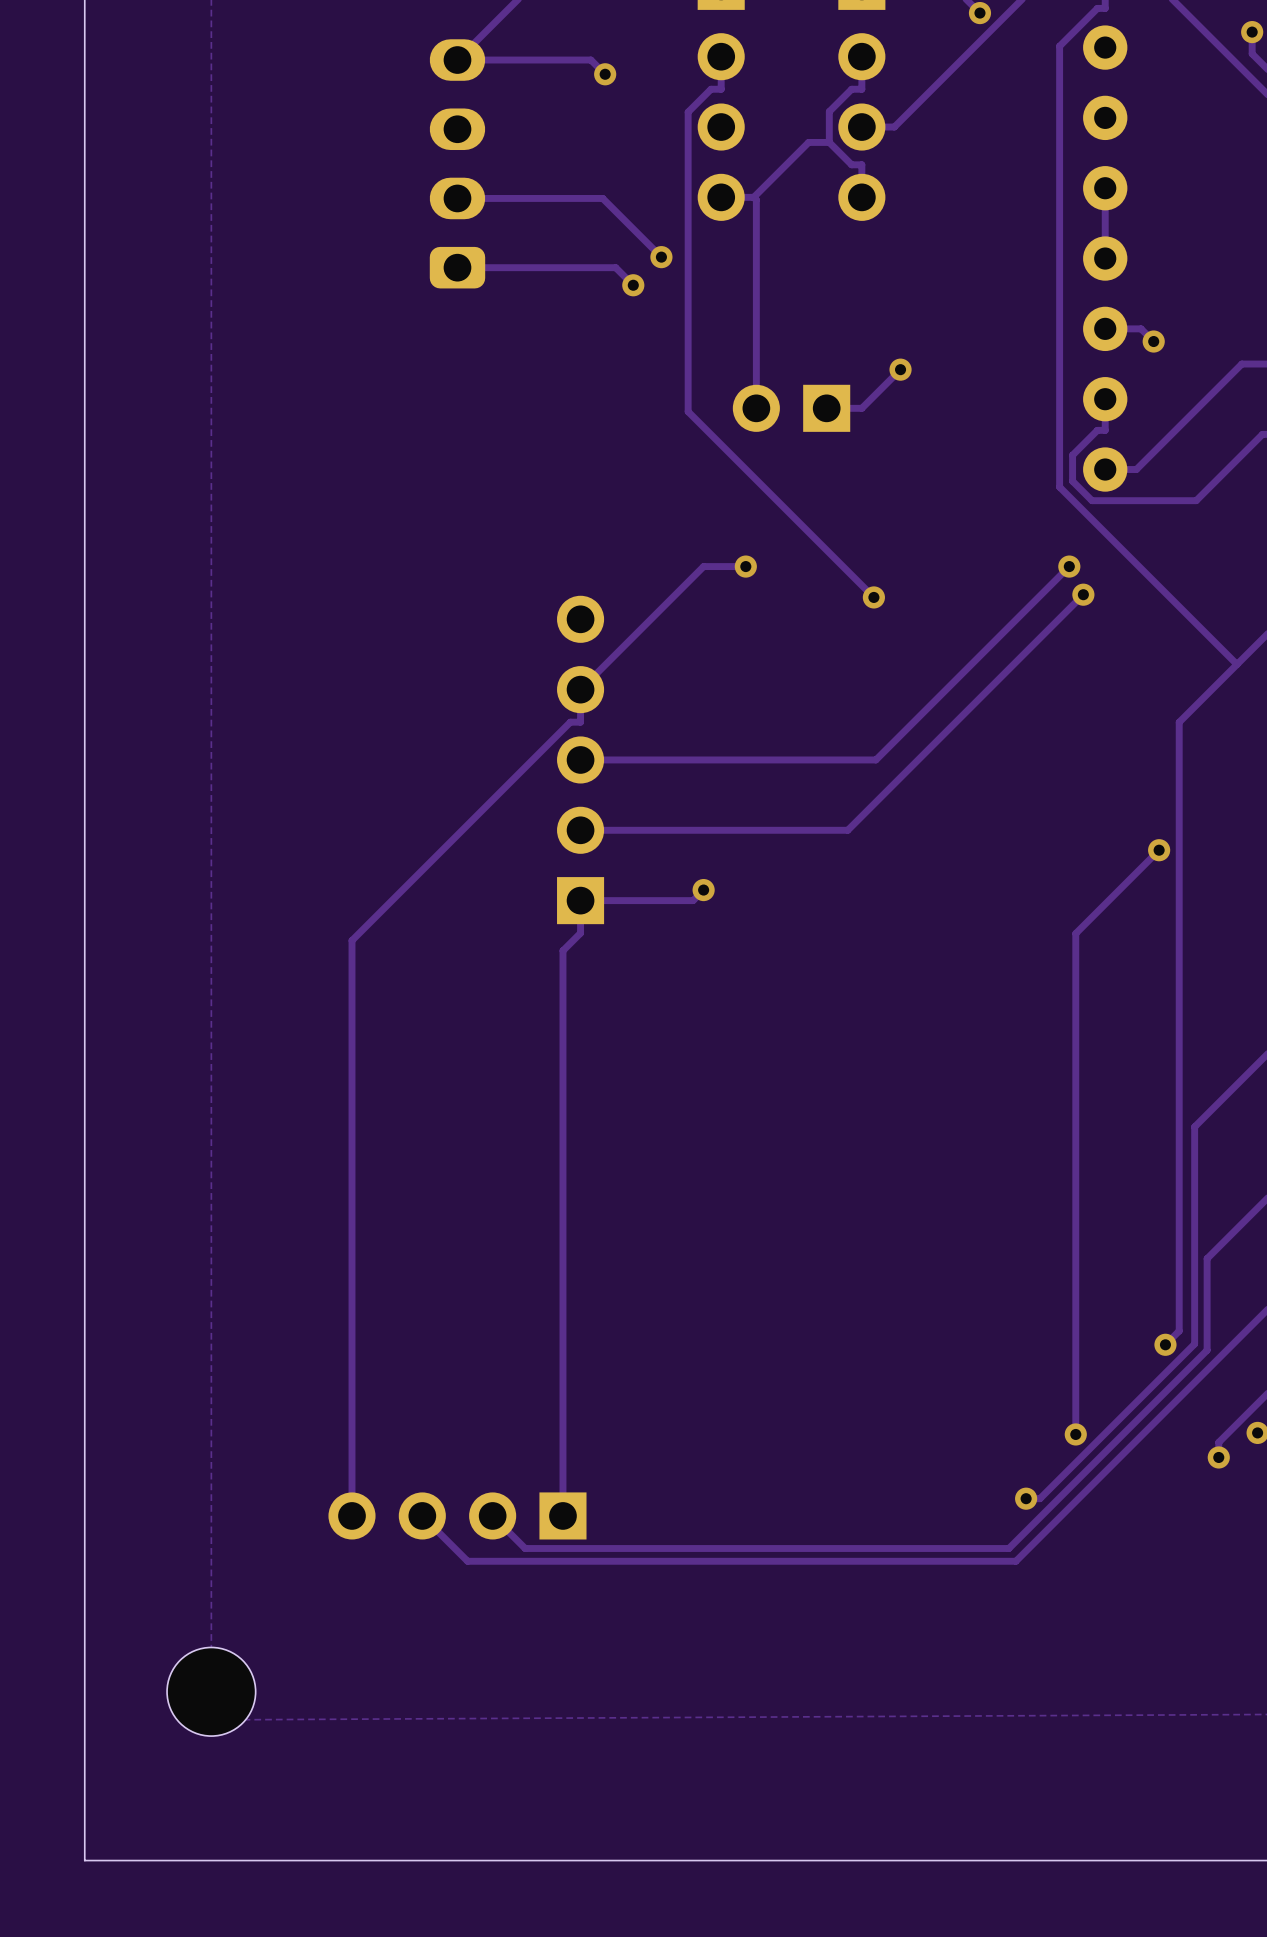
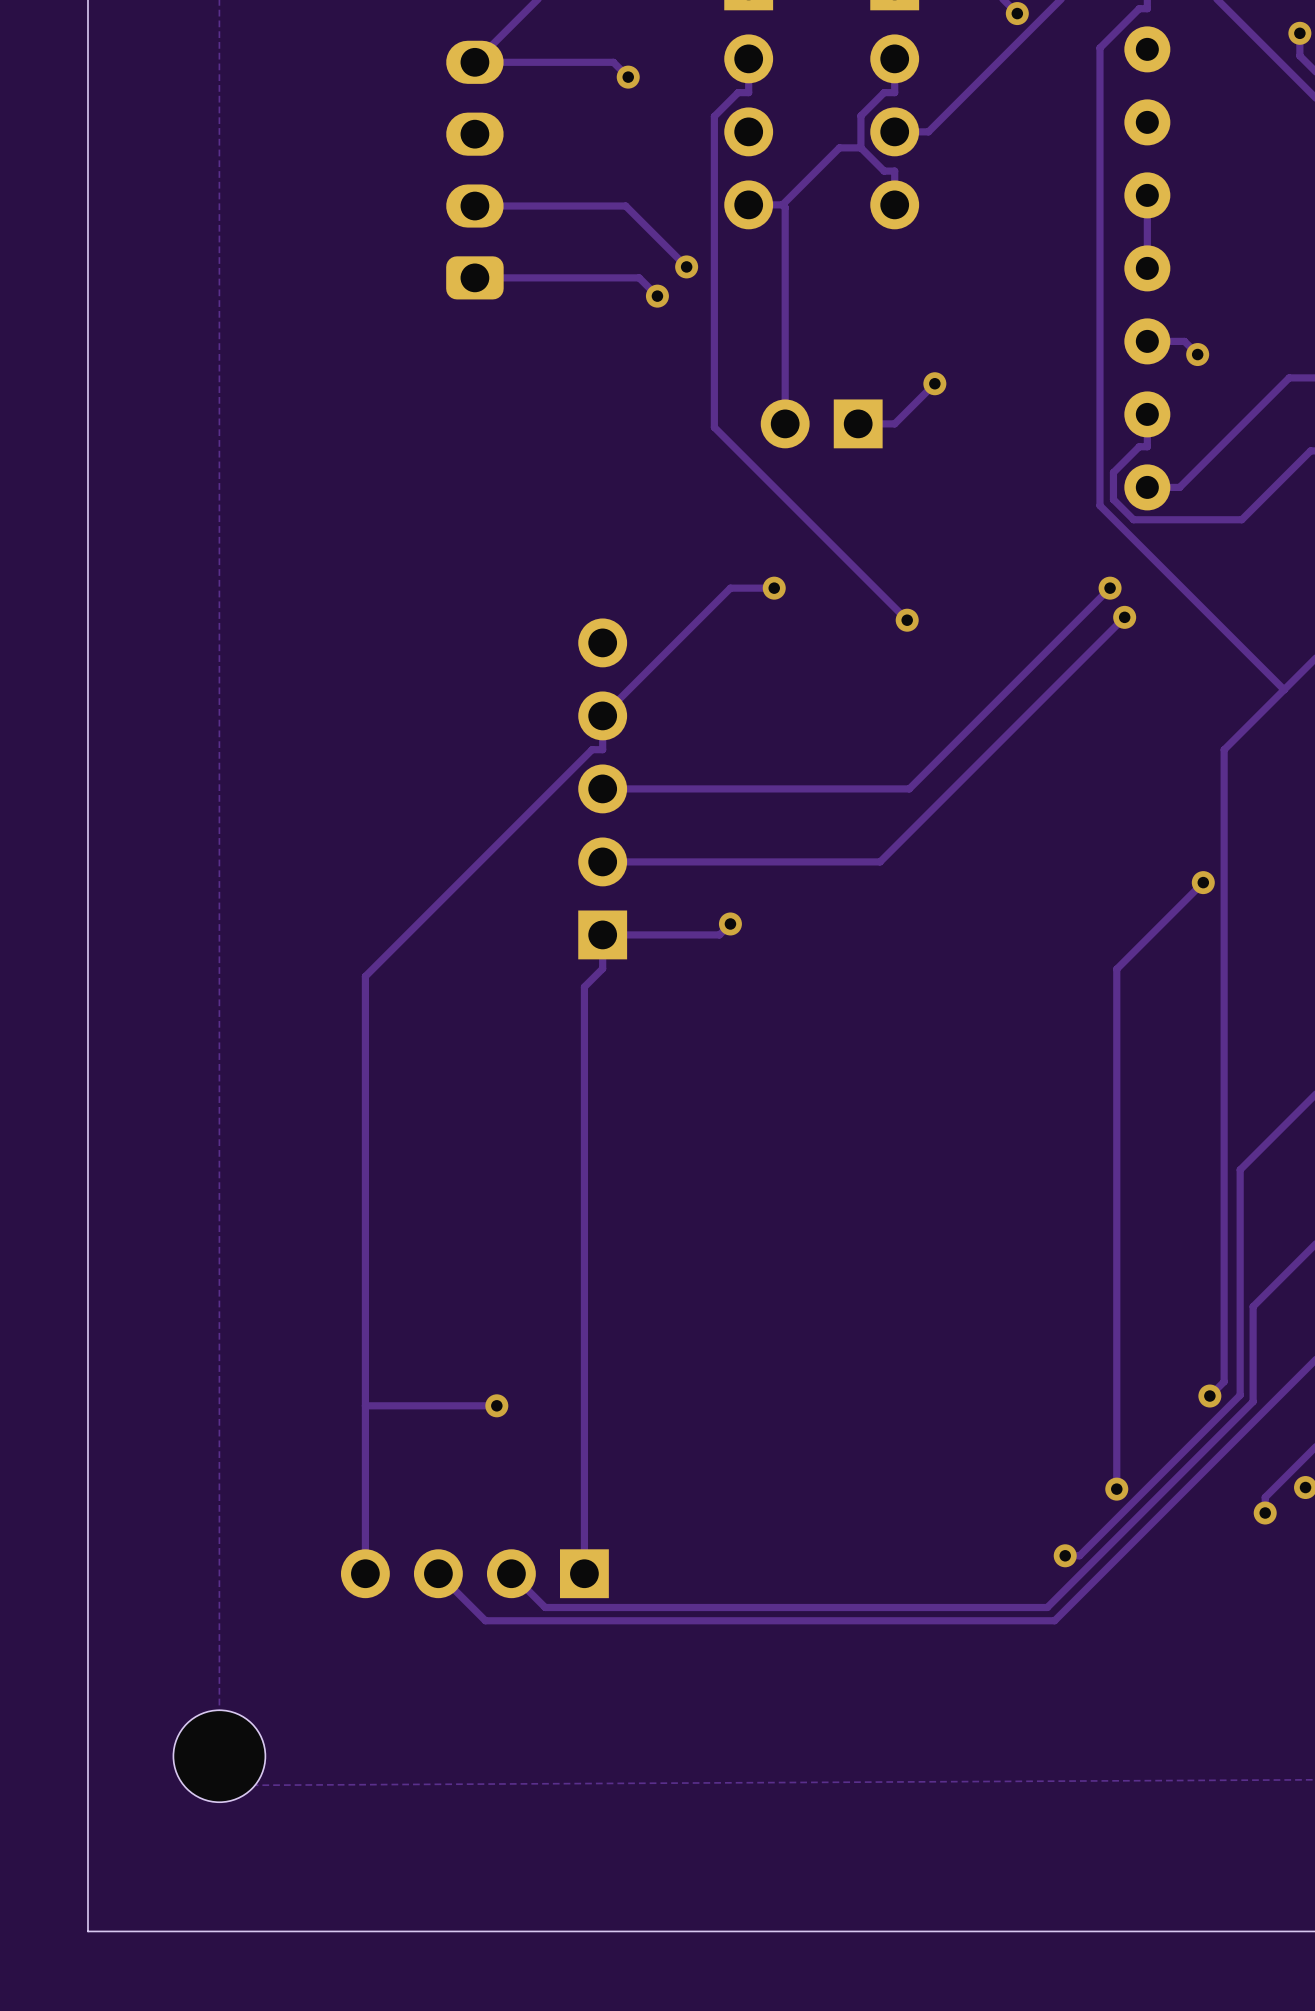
track: none -> (496, 1405) (365, 1405)
via: none -> (496, 1405)

